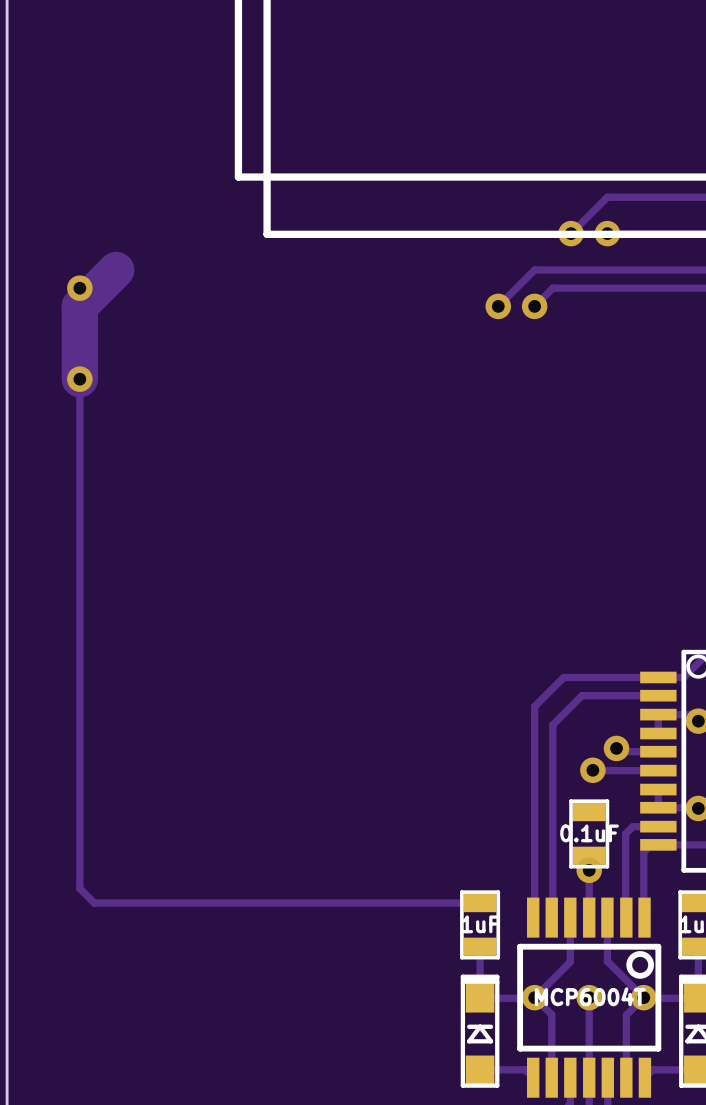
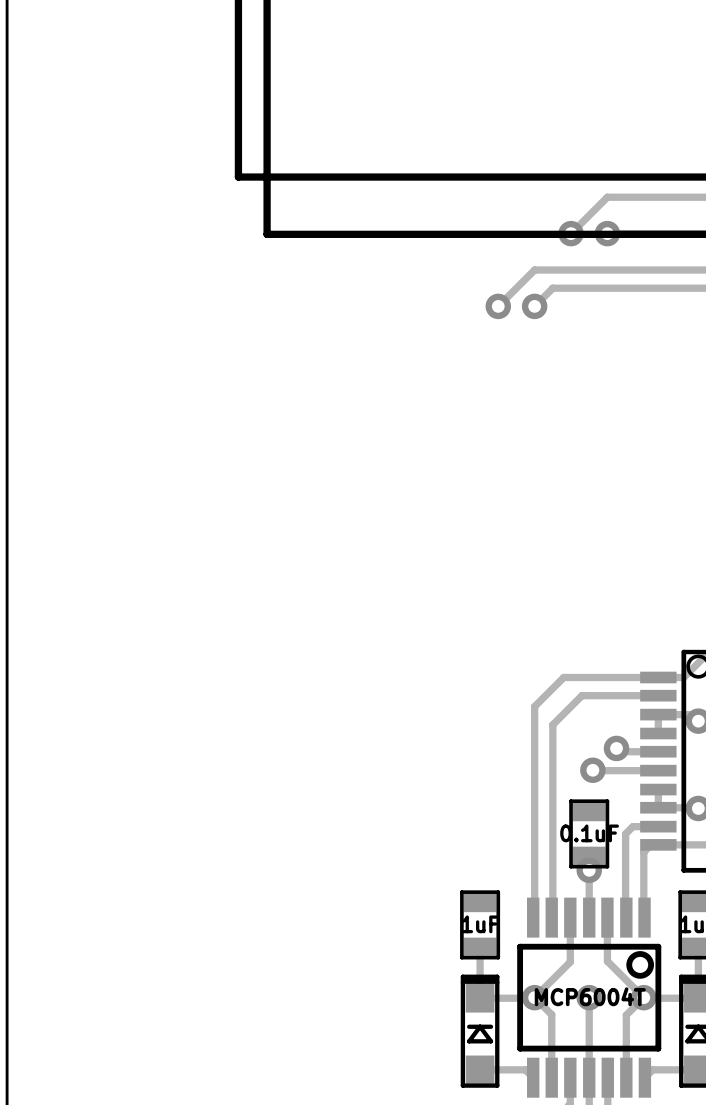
track: (116, 270) (79, 306) (79, 888) (94, 903) (480, 903) -> none
via: (79, 288) -> none
via: (79, 379) -> none

